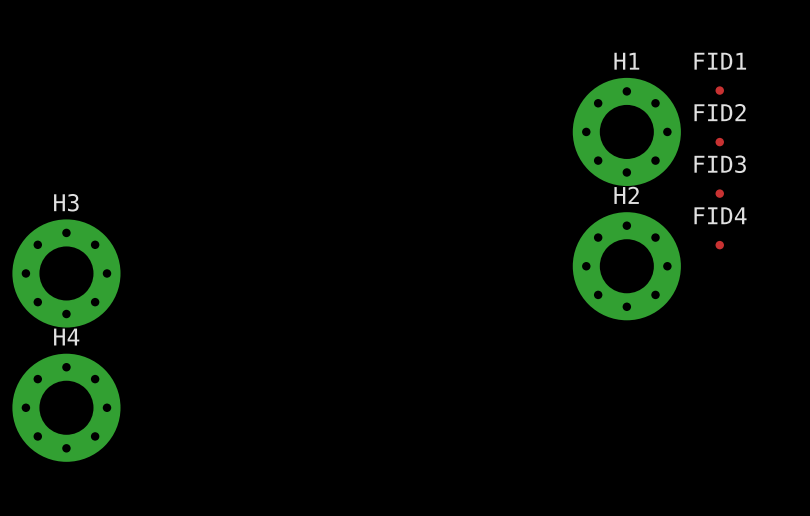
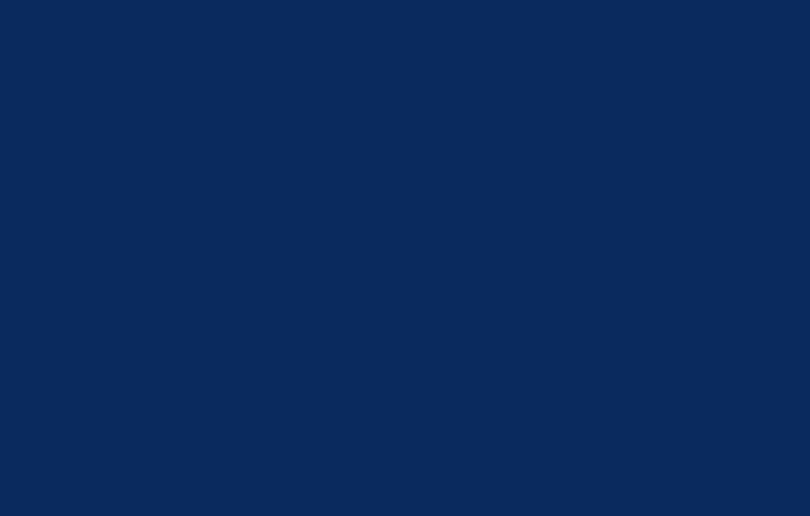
FID1: (719, 90) -> none
H1: (626, 131) -> none
FID2: (719, 142) -> none
FID3: (719, 193) -> none
FID4: (719, 245) -> none
H2: (626, 266) -> none
H3: (66, 273) -> none
H4: (66, 407) -> none

